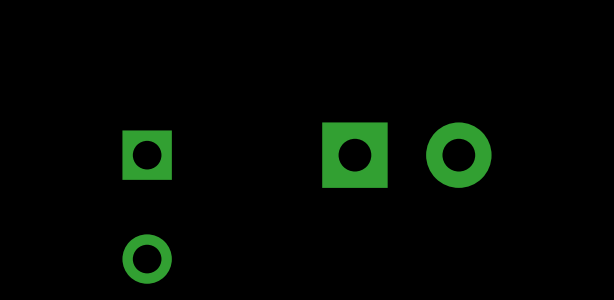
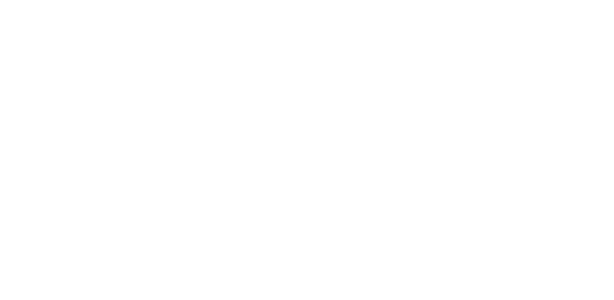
part: (406, 155) -> none
part: (147, 207) -> none

